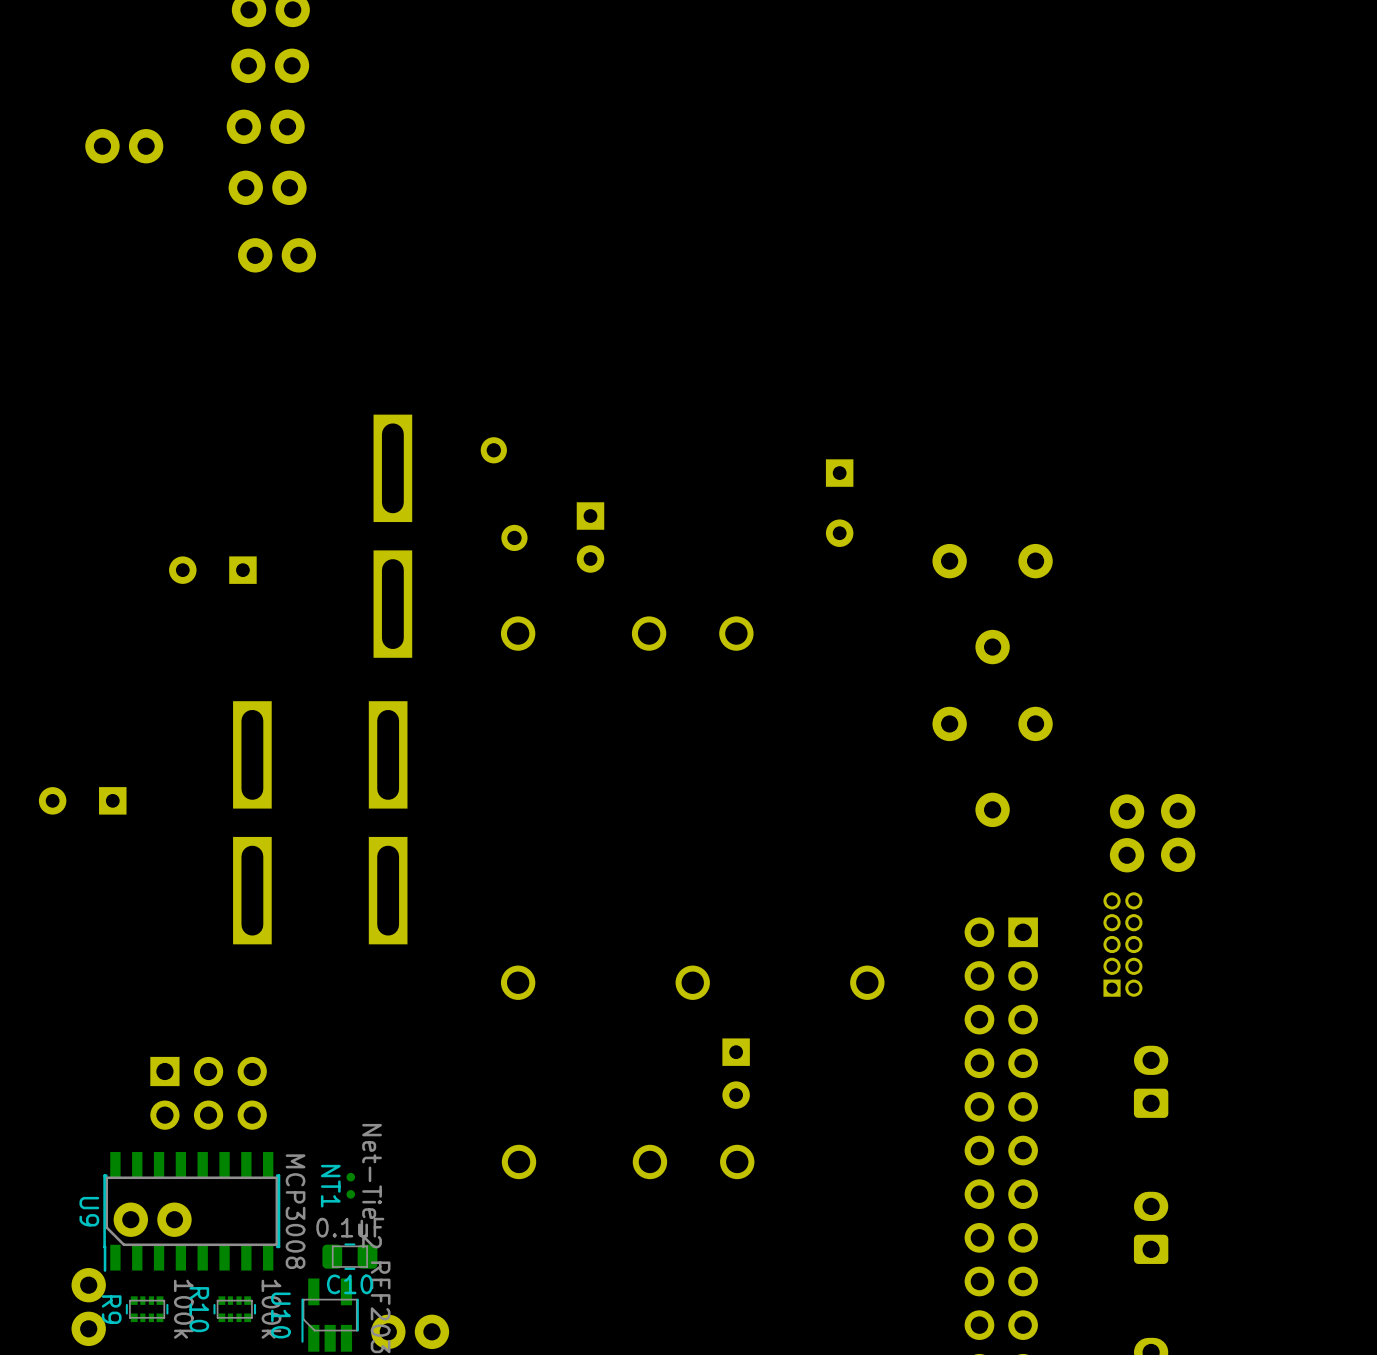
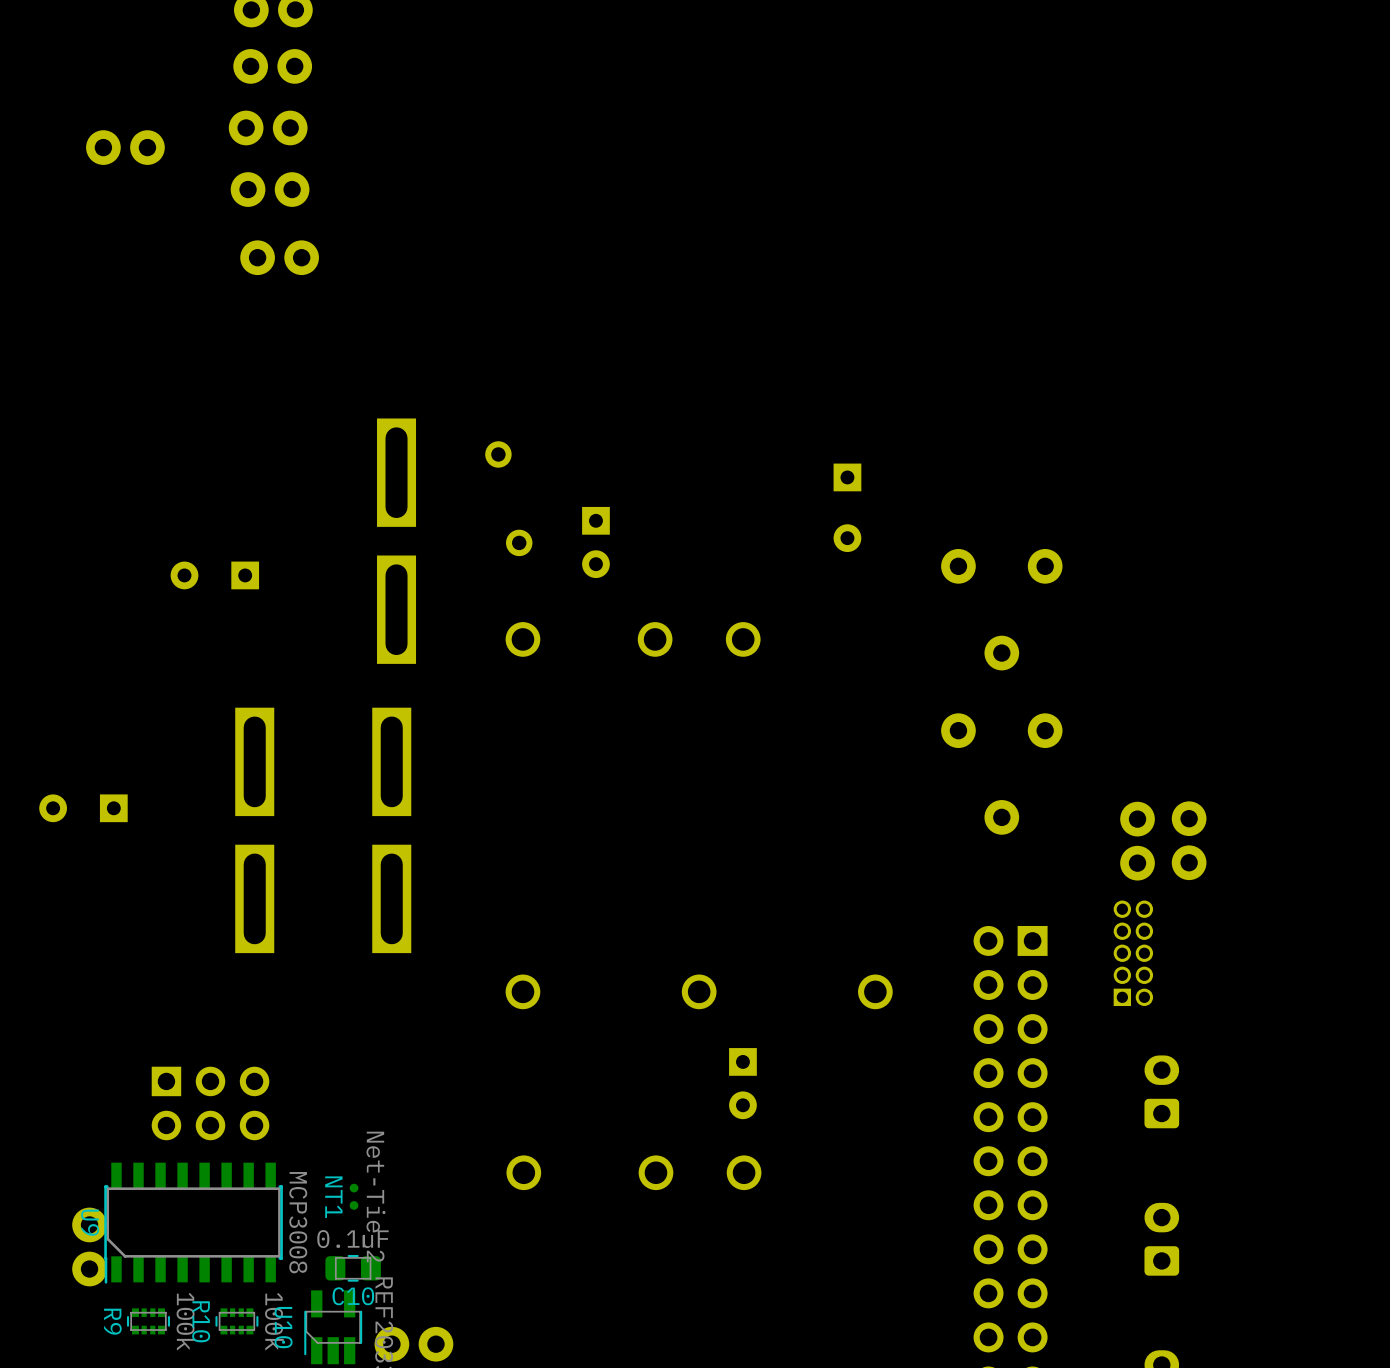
part: (152, 1219) -> none
part: none -> (89, 1246)
part: (88, 1307) -> none

